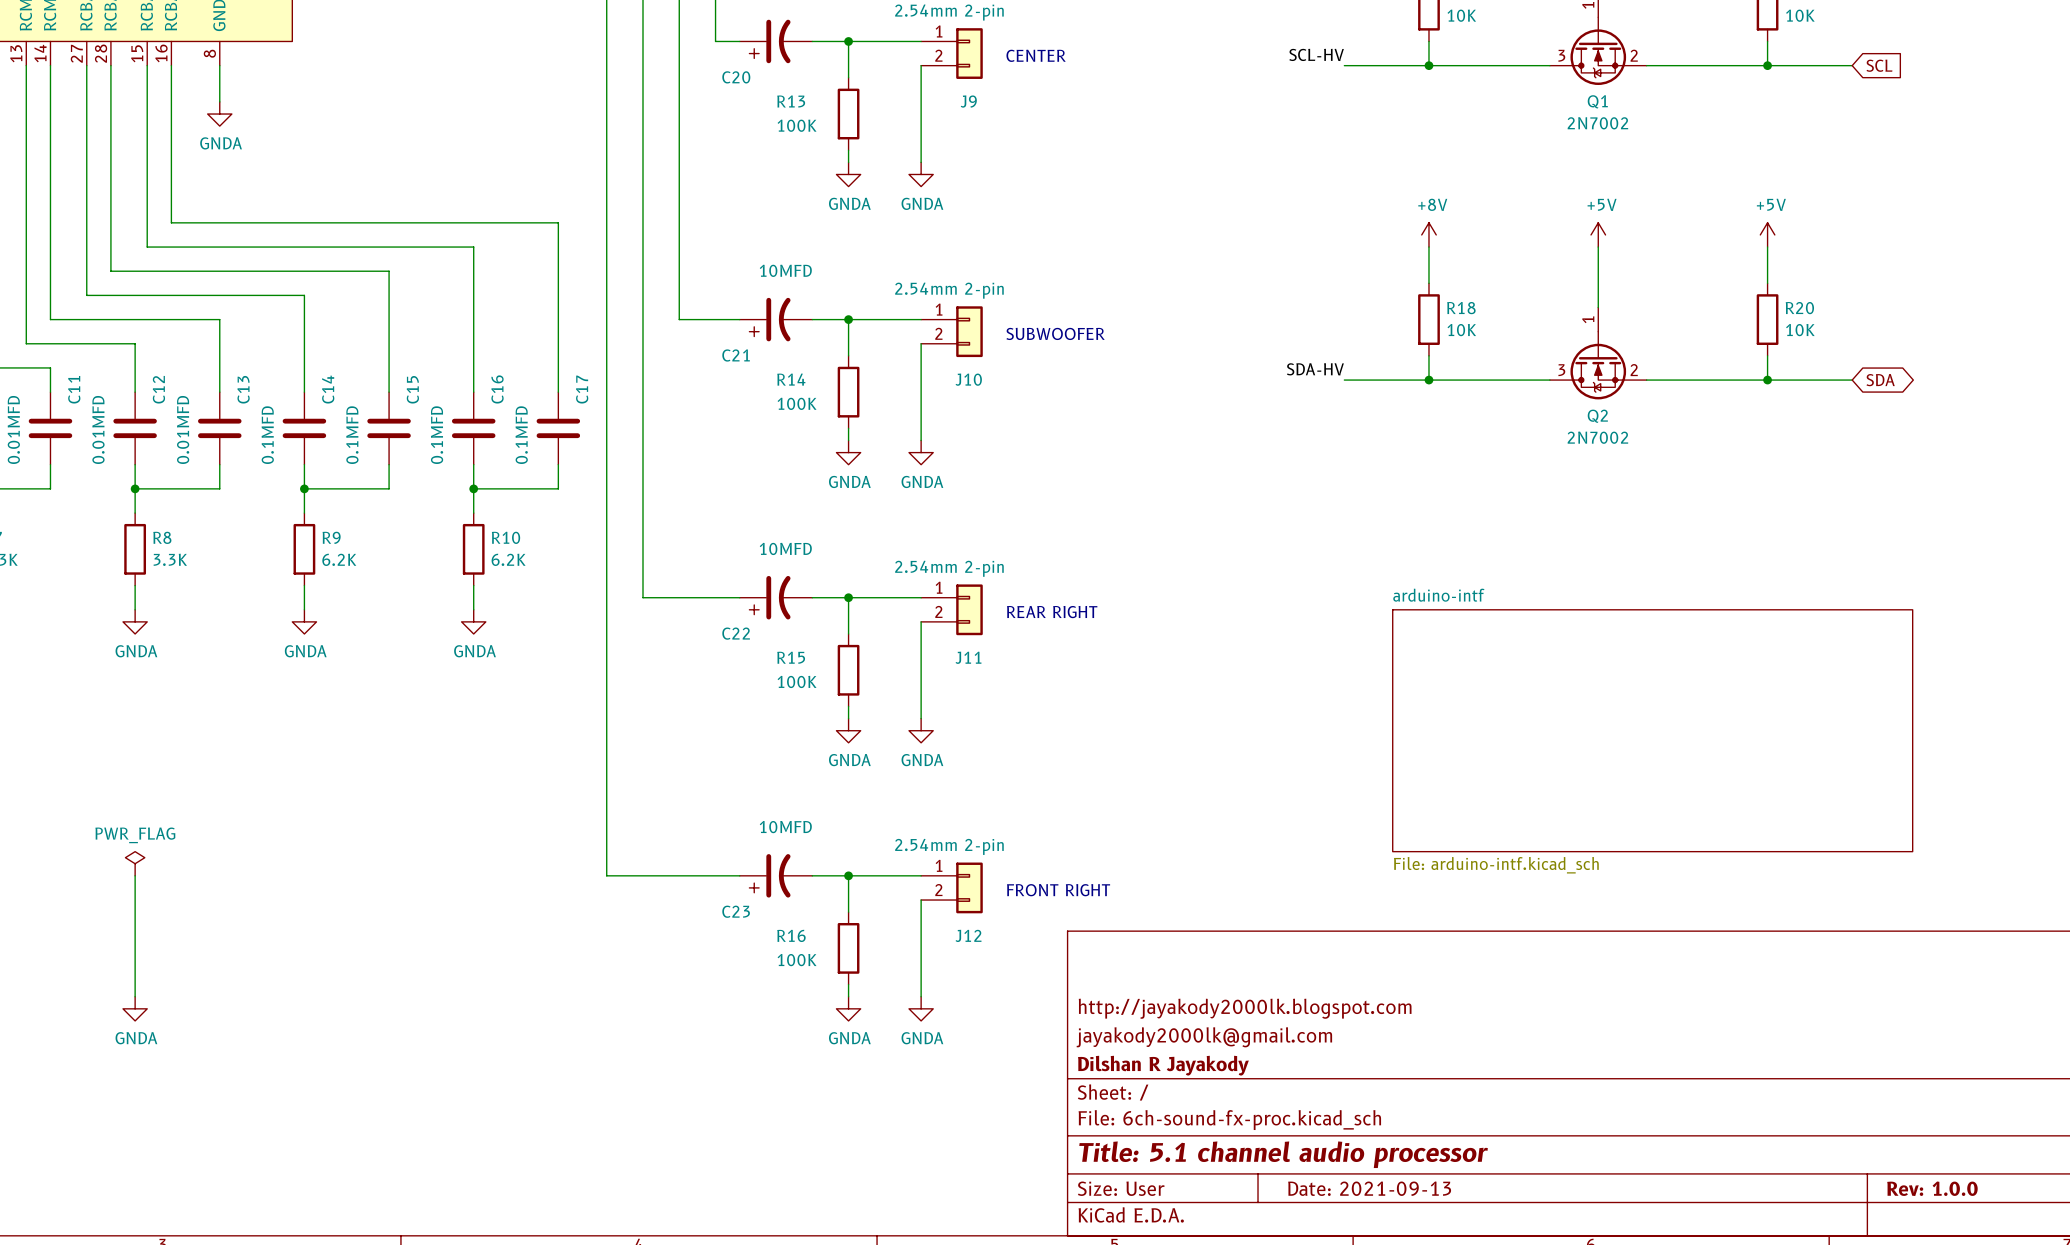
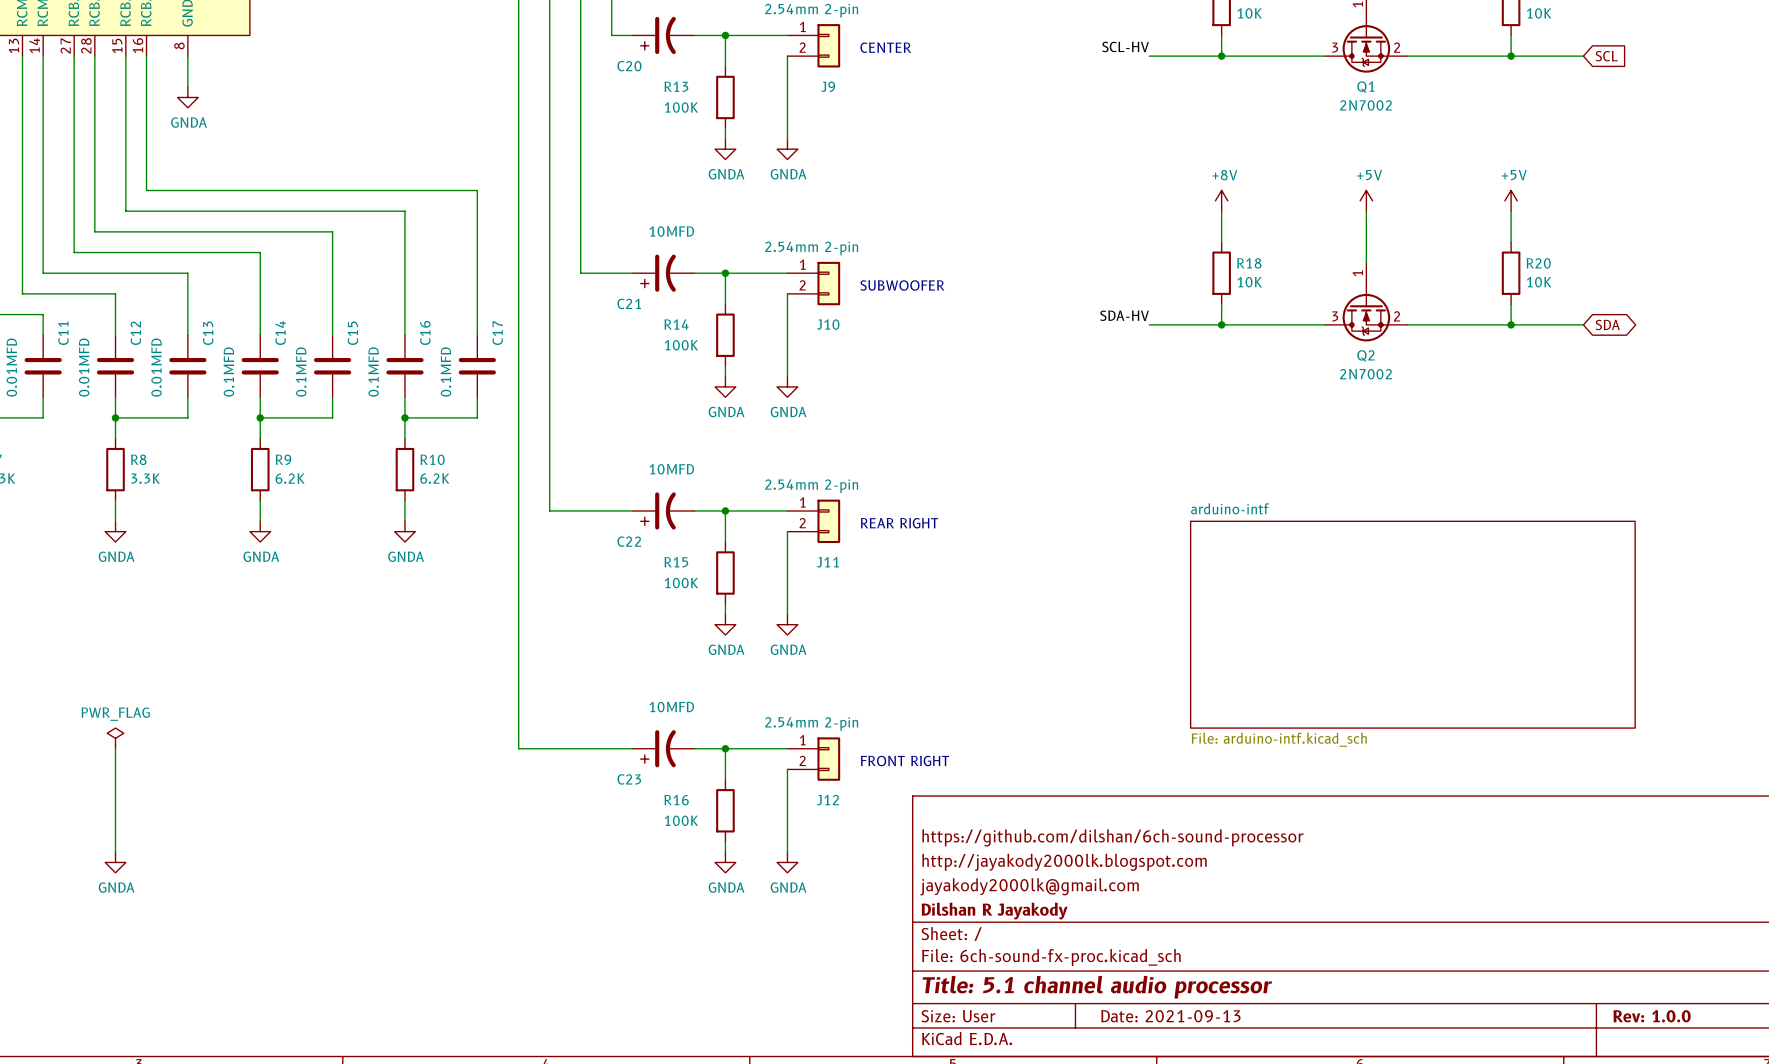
title block: none -> https://github.com/dilshan/6ch-sound-processor (1112, 837)

